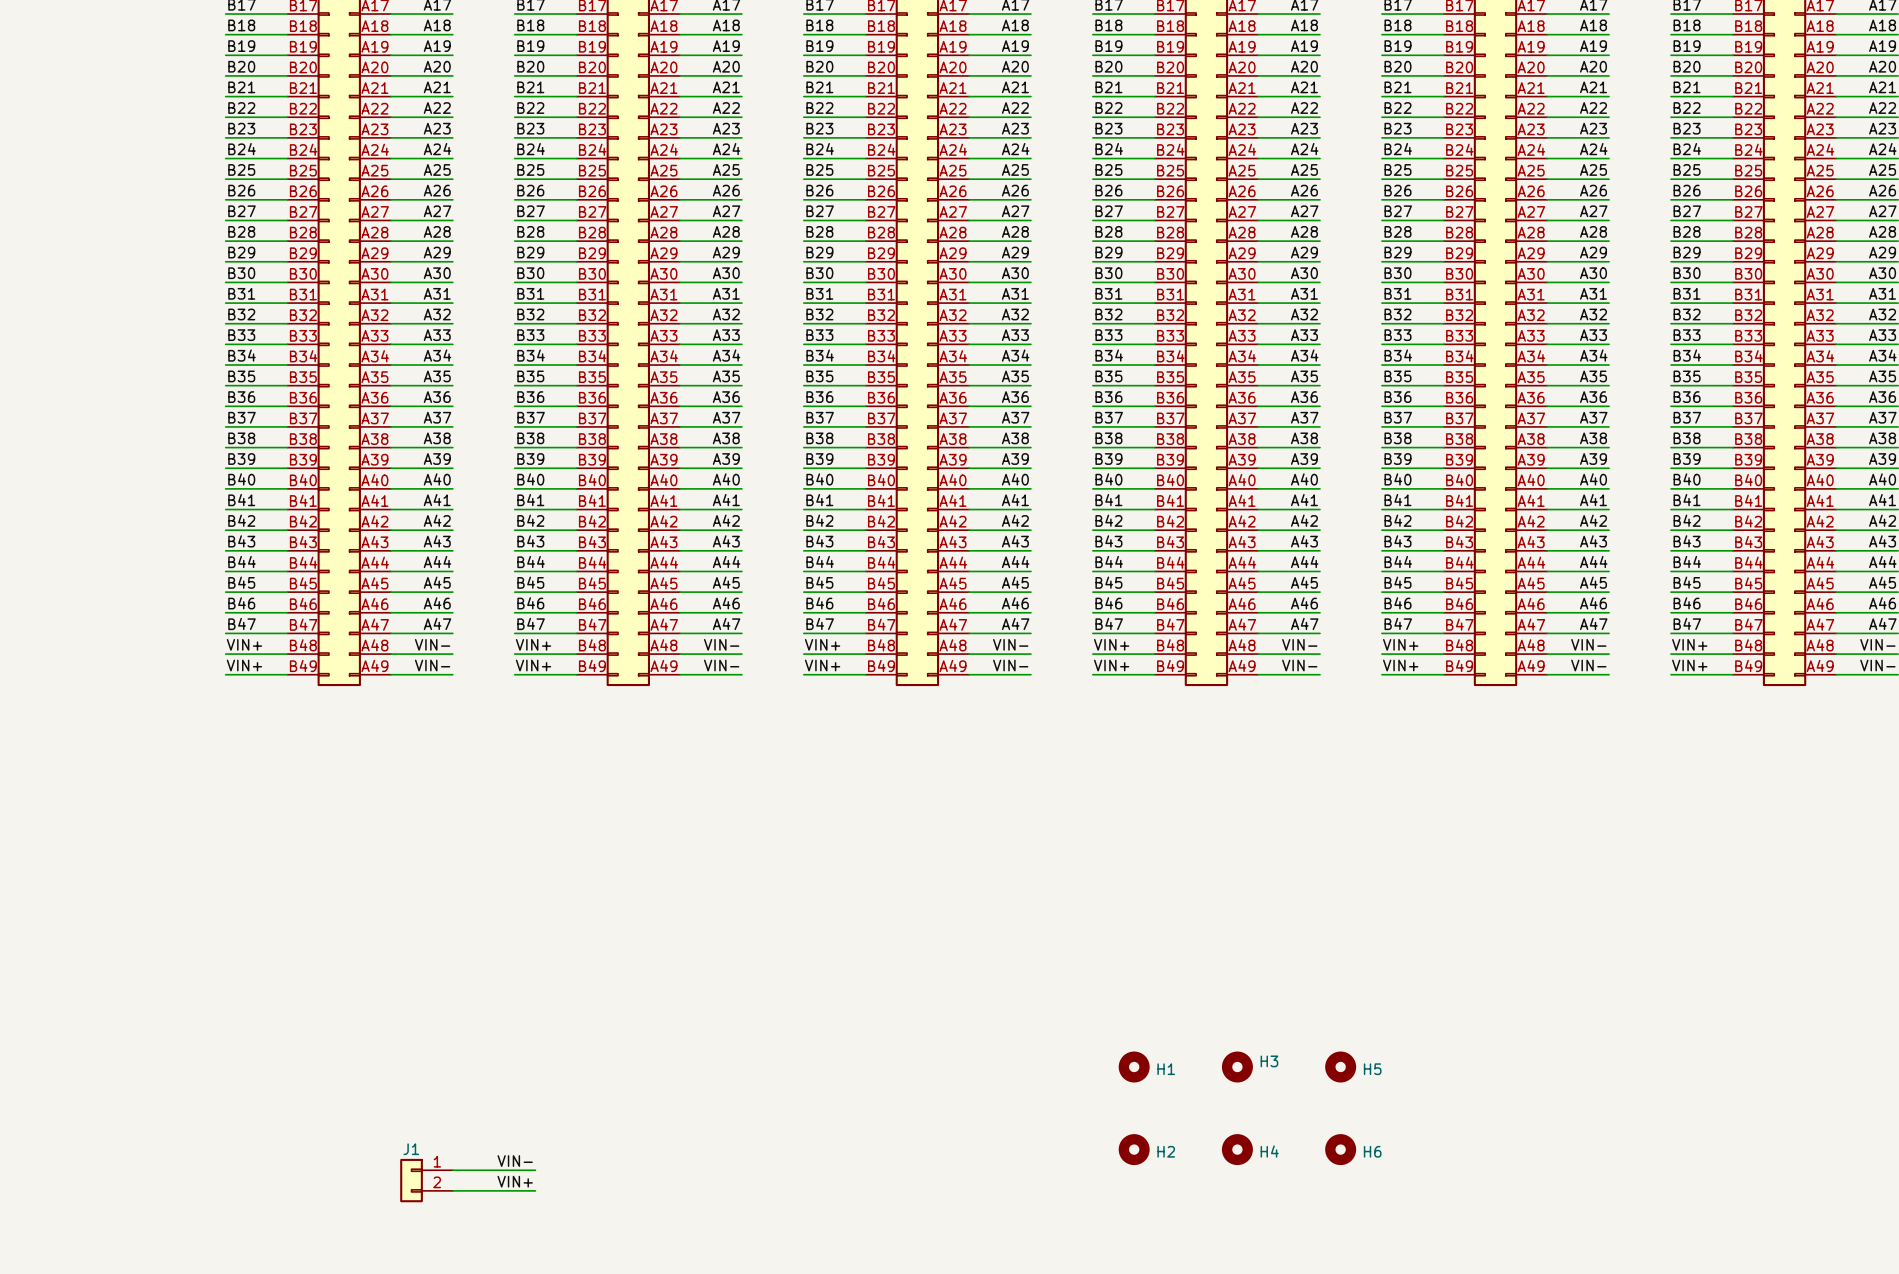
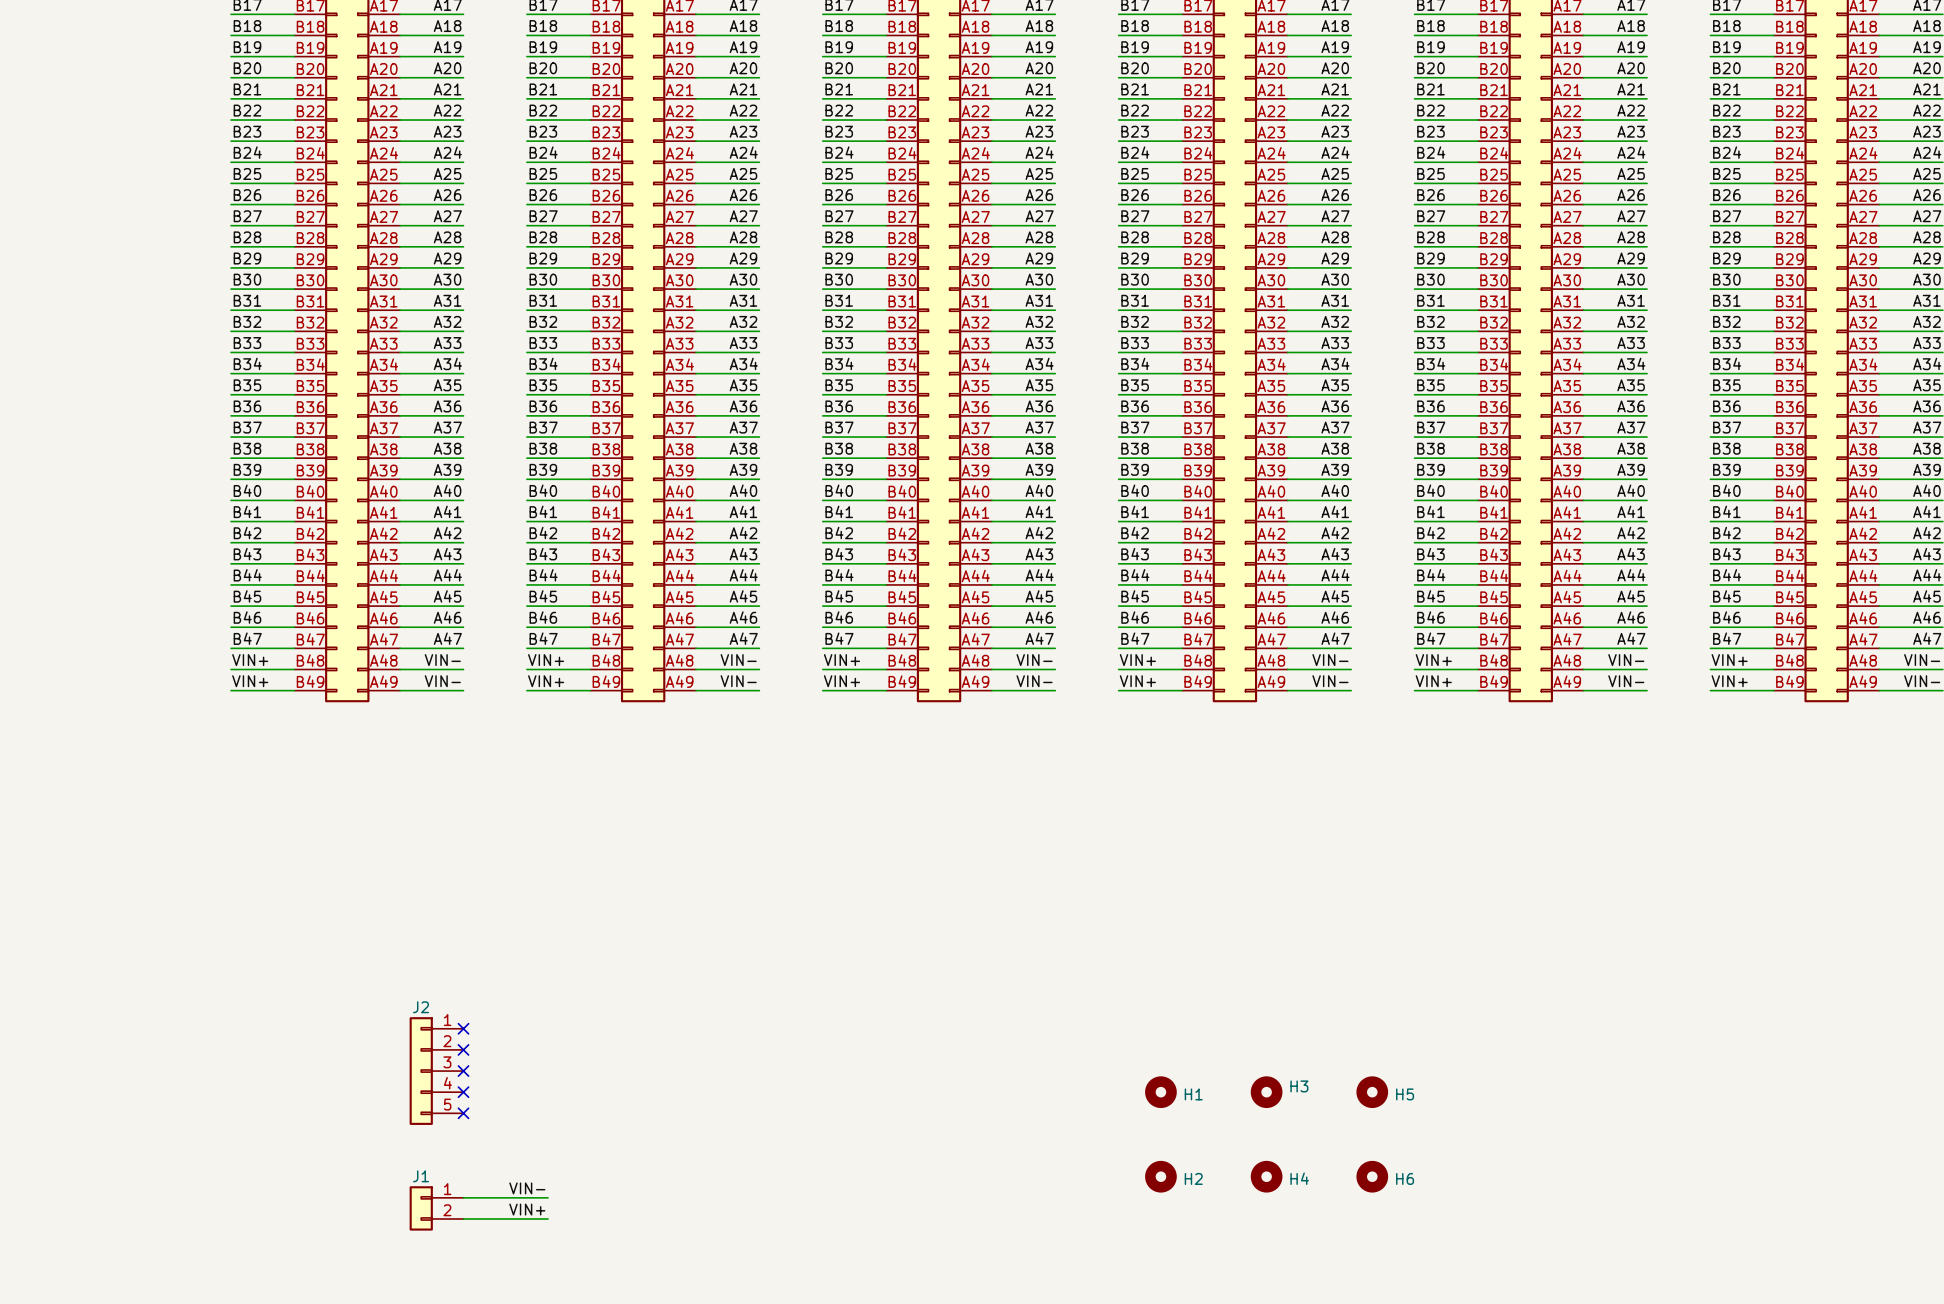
no-connect mark: none -> (463, 1028)
no-connect mark: none -> (463, 1049)
J2: none -> (436, 1071)
no-connect mark: none -> (463, 1071)
no-connect mark: none -> (463, 1092)
no-connect mark: none -> (463, 1113)

